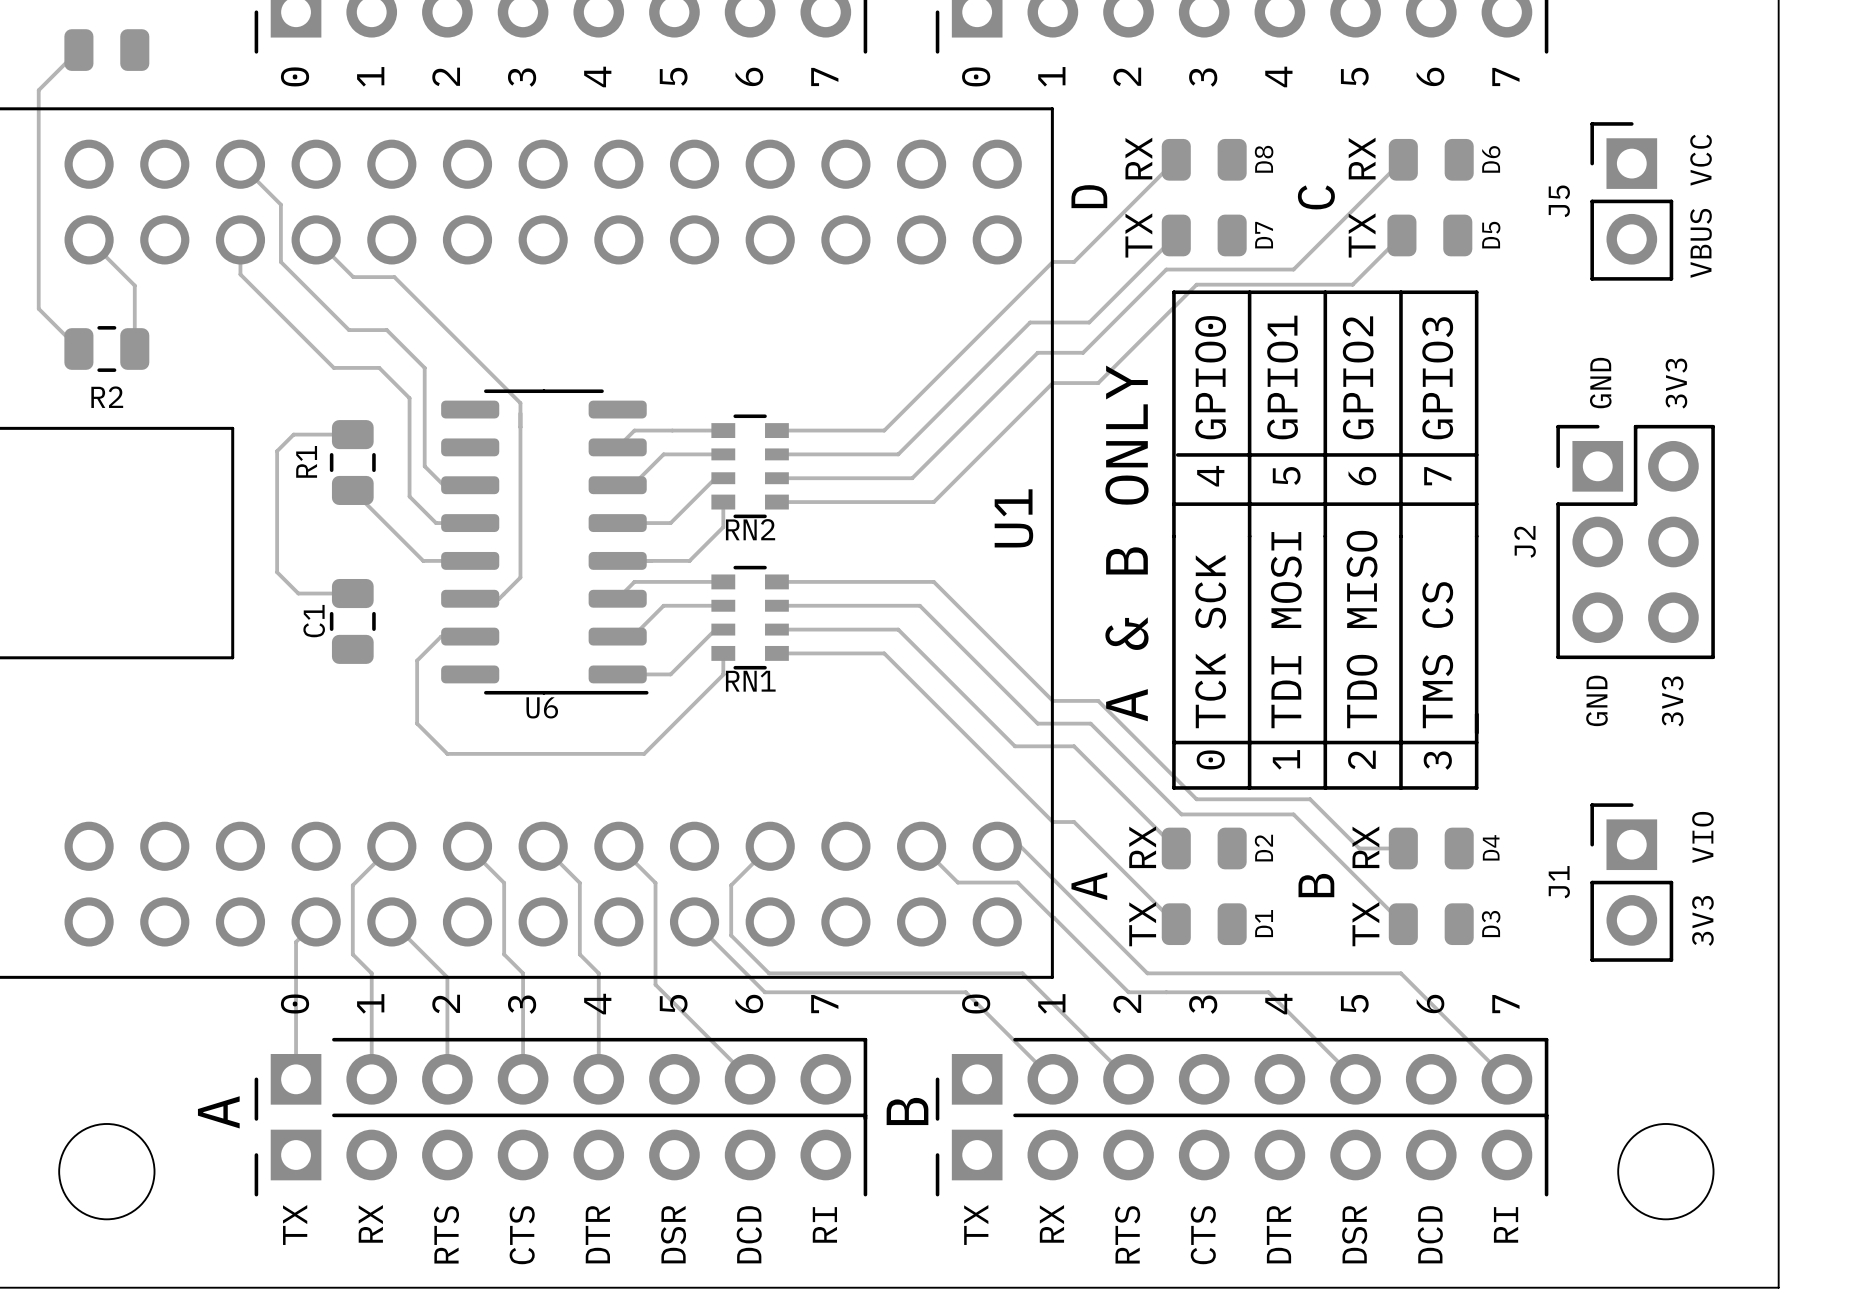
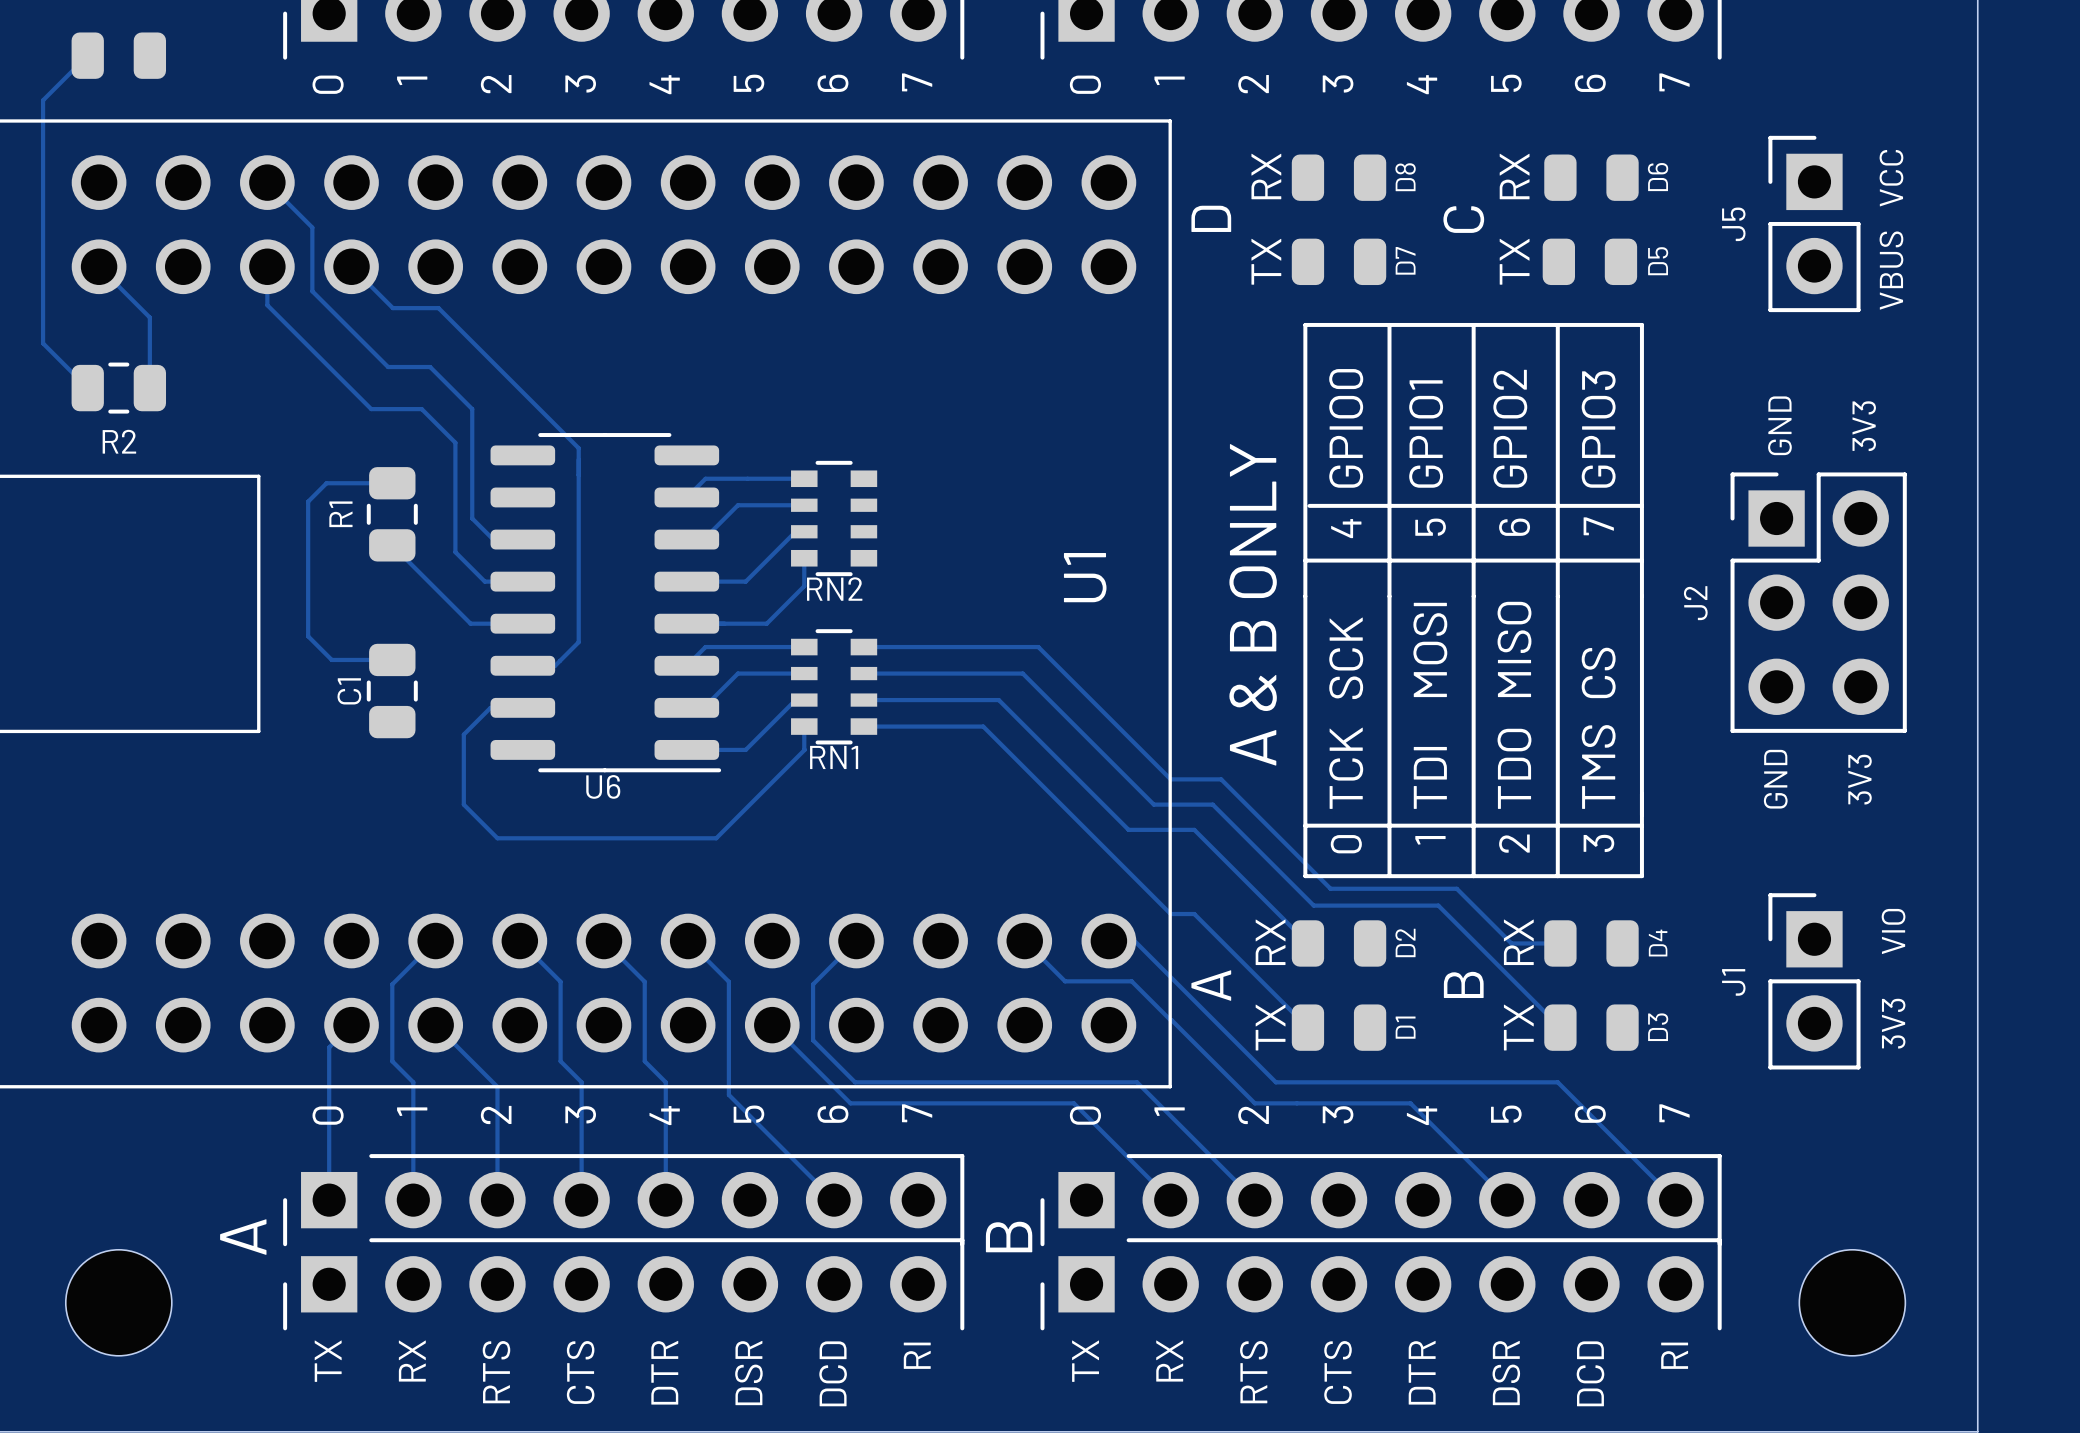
track: (1176, 159) (1074, 261) (1052, 261) (884, 430) (776, 430) -> none
track: (1403, 159) (1293, 269) (1166, 269) (1083, 352) (1037, 352) (912, 478) (776, 478) -> none
track: (1176, 235) (1089, 322) (1030, 322) (898, 454) (776, 454) -> none
track: (1401, 235) (1352, 284) (1196, 284) (1098, 383) (1052, 383) (933, 502) (776, 502) -> none
U1 name position: U1 (1013, 518) -> U1 (1085, 577)

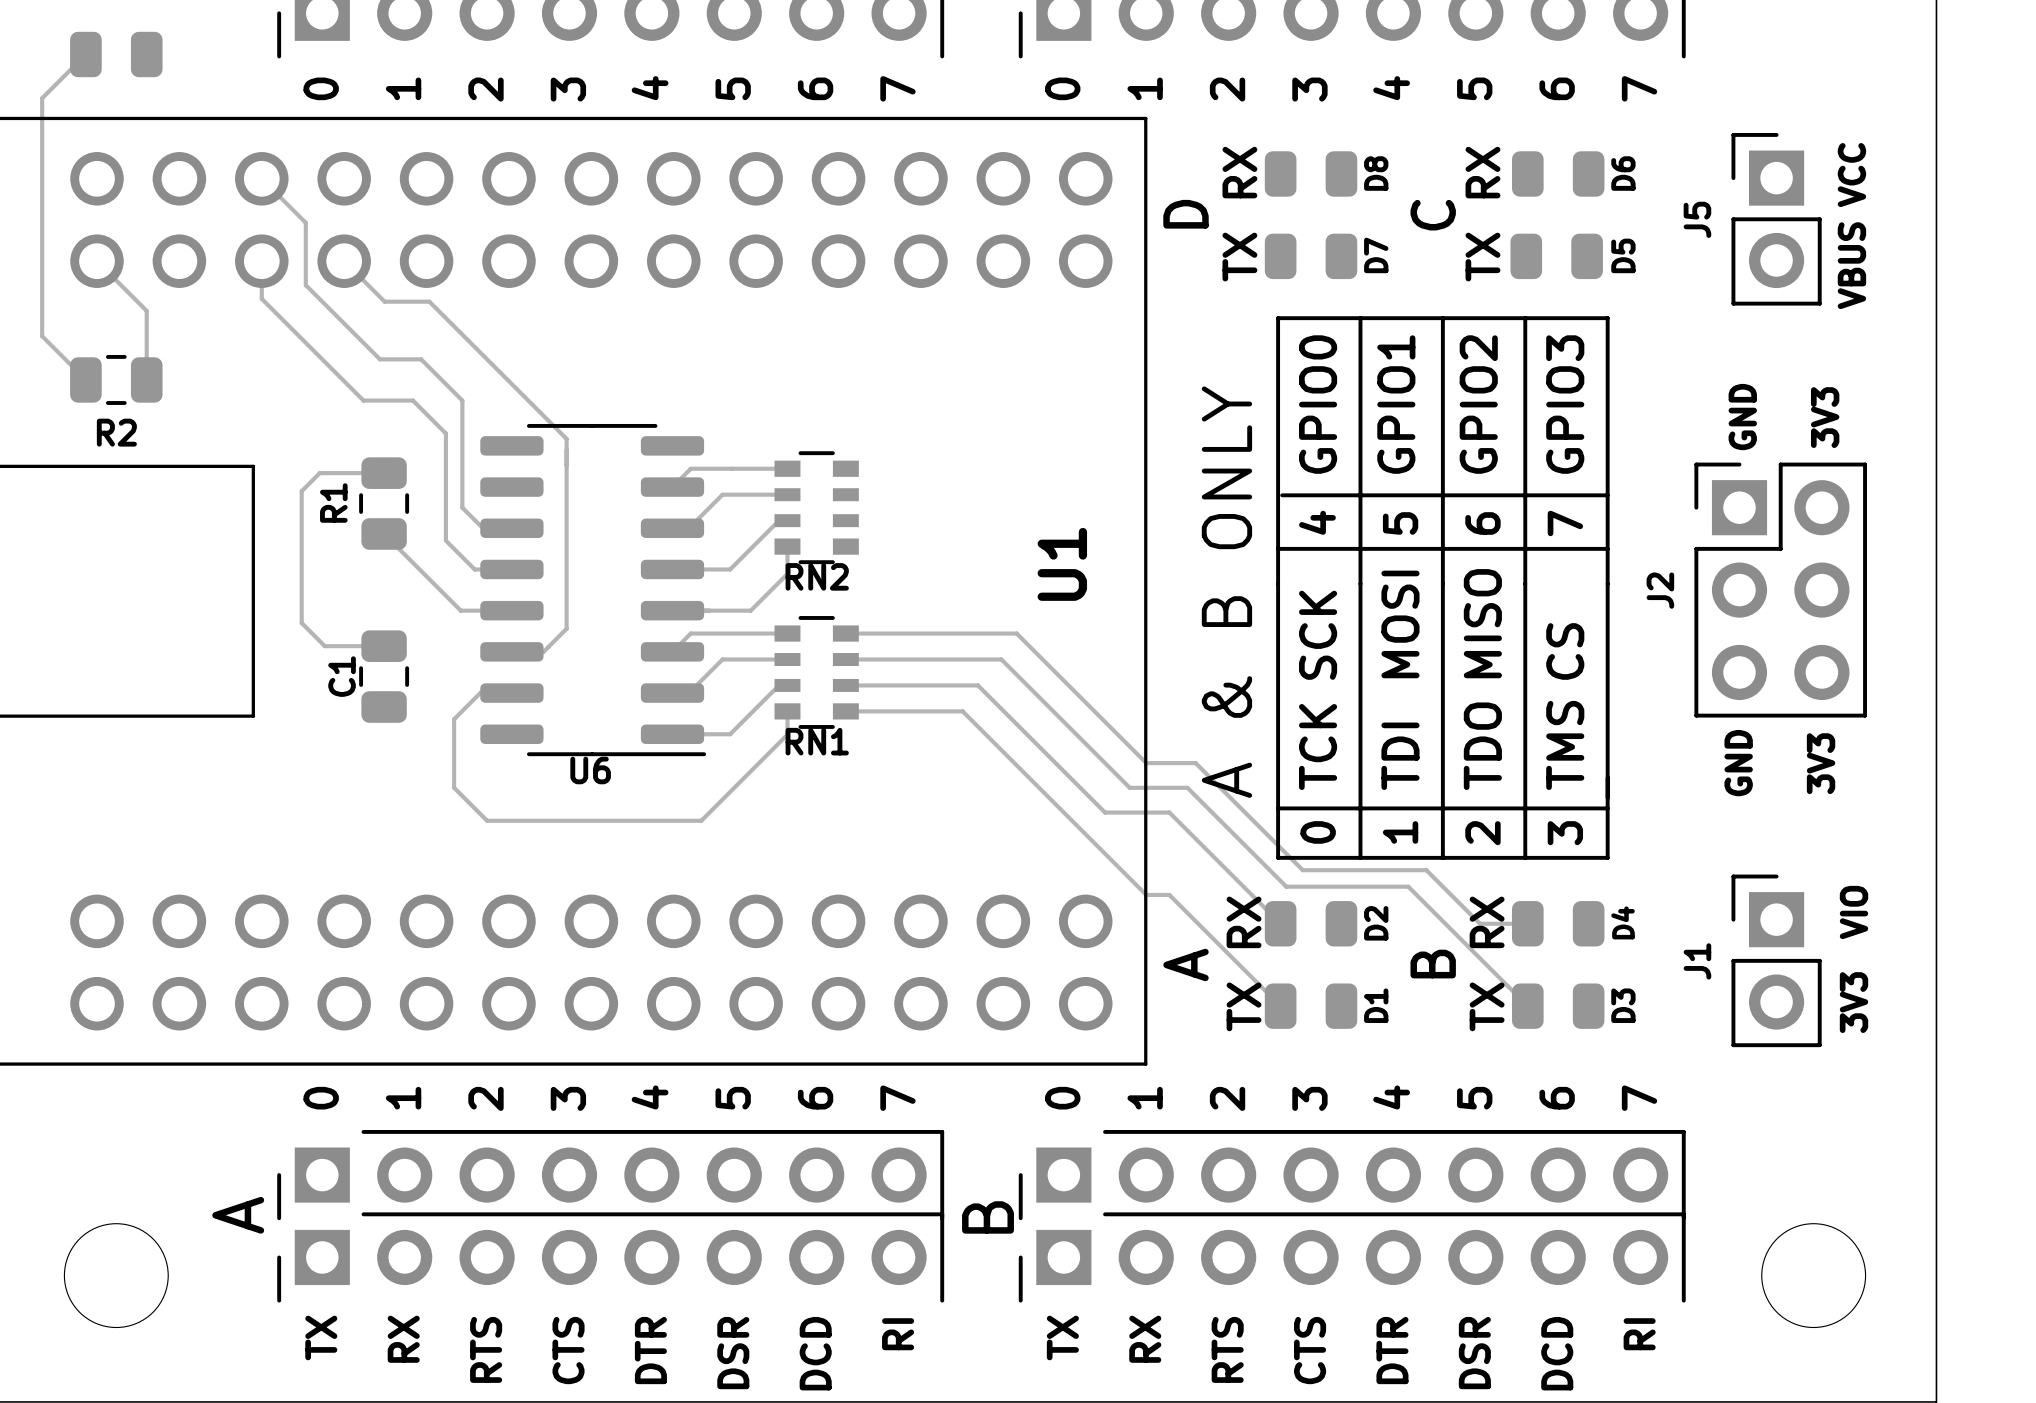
track: (435, 941) (392, 984) (392, 1061) (413, 1082) (413, 1200) -> none
track: (519, 941) (560, 981) (560, 1061) (581, 1082) (581, 1200) -> none
track: (603, 941) (644, 981) (644, 1061) (665, 1082) (665, 1200) -> none
track: (688, 941) (728, 981) (728, 1094) (834, 1200) -> none
track: (856, 941) (813, 984) (813, 1040) (855, 1082) (1137, 1082) (1254, 1200) -> none
track: (1024, 941) (1065, 981) (1131, 981) (1254, 1103) (1410, 1103) (1507, 1200) -> none
track: (1108, 941) (1134, 941) (1275, 1082) (1557, 1082) (1675, 1200) -> none
track: (351, 1025) (329, 1047) (329, 1200) -> none
track: (435, 1025) (497, 1086) (497, 1200) -> none
track: (772, 1025) (850, 1103) (1073, 1103) (1170, 1200) -> none

